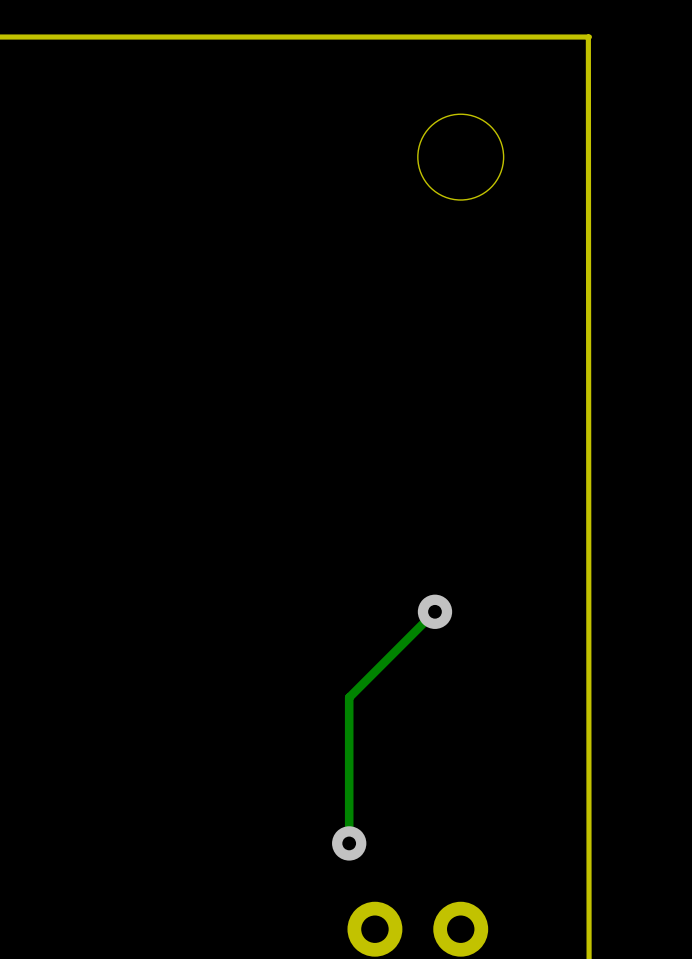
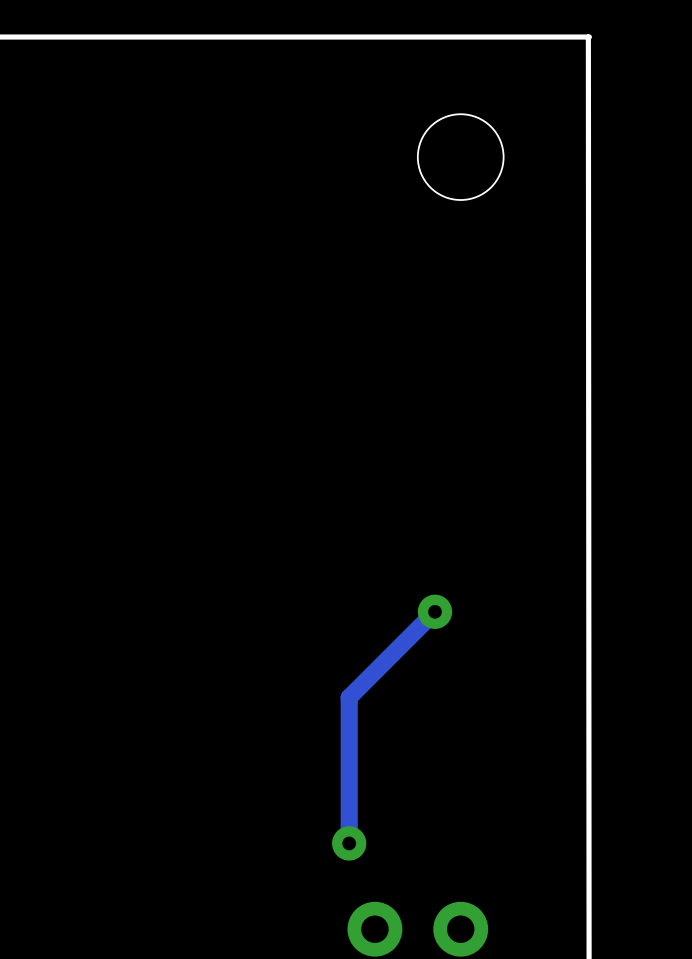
track width: thin (434, 611) (349, 697) (349, 843) -> thick (434, 611) (349, 697) (349, 843)

